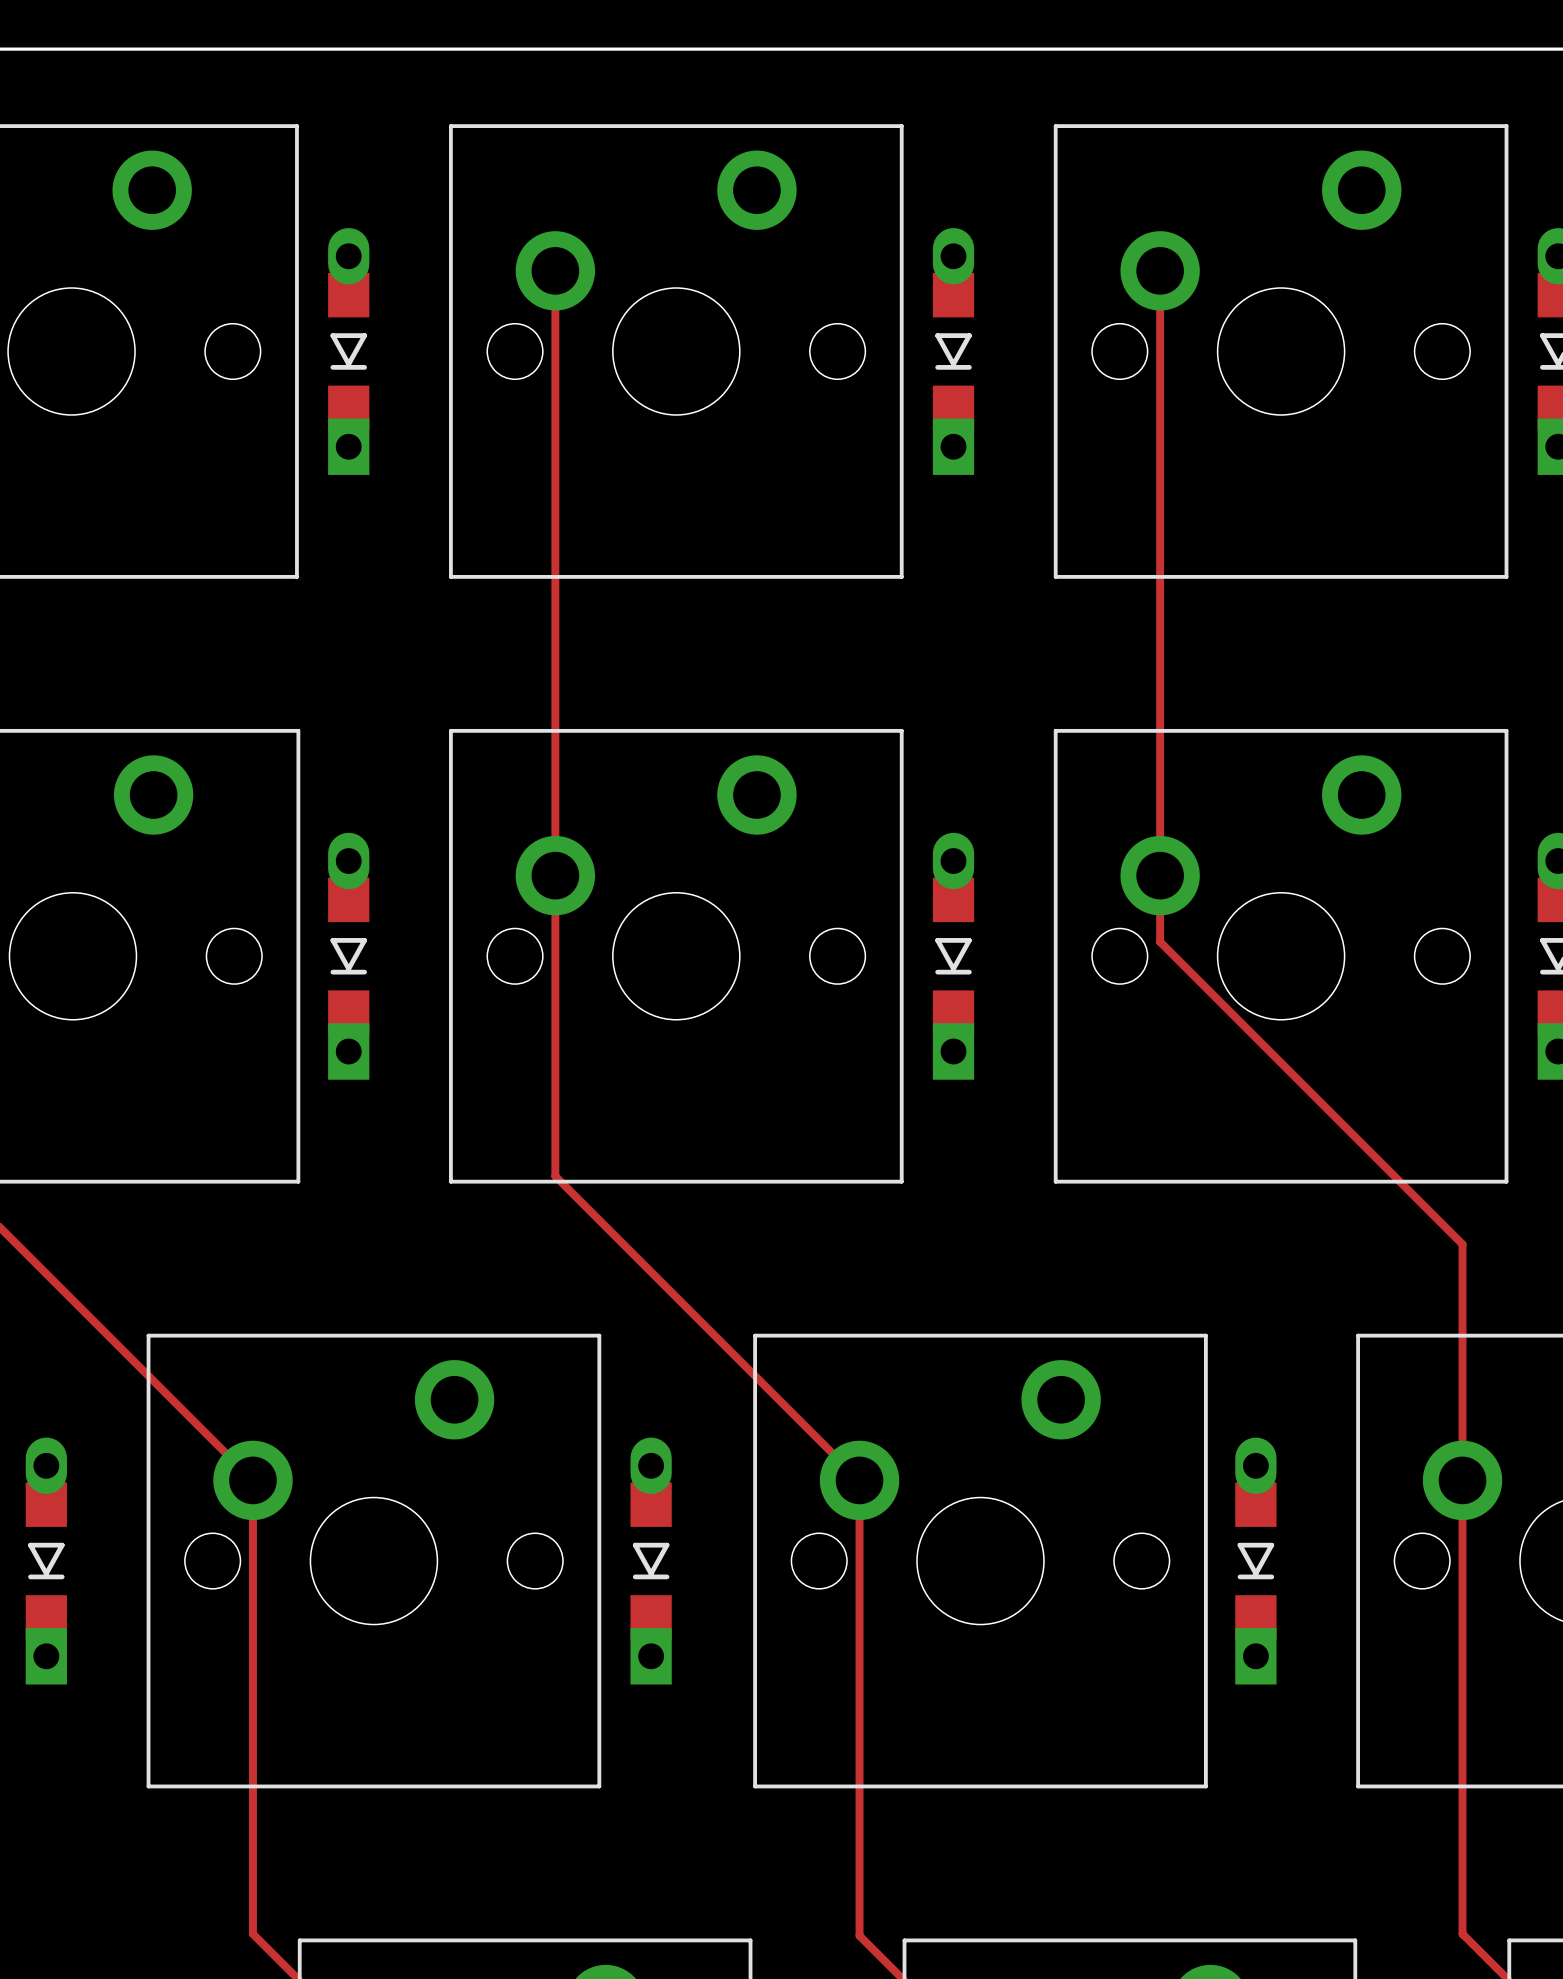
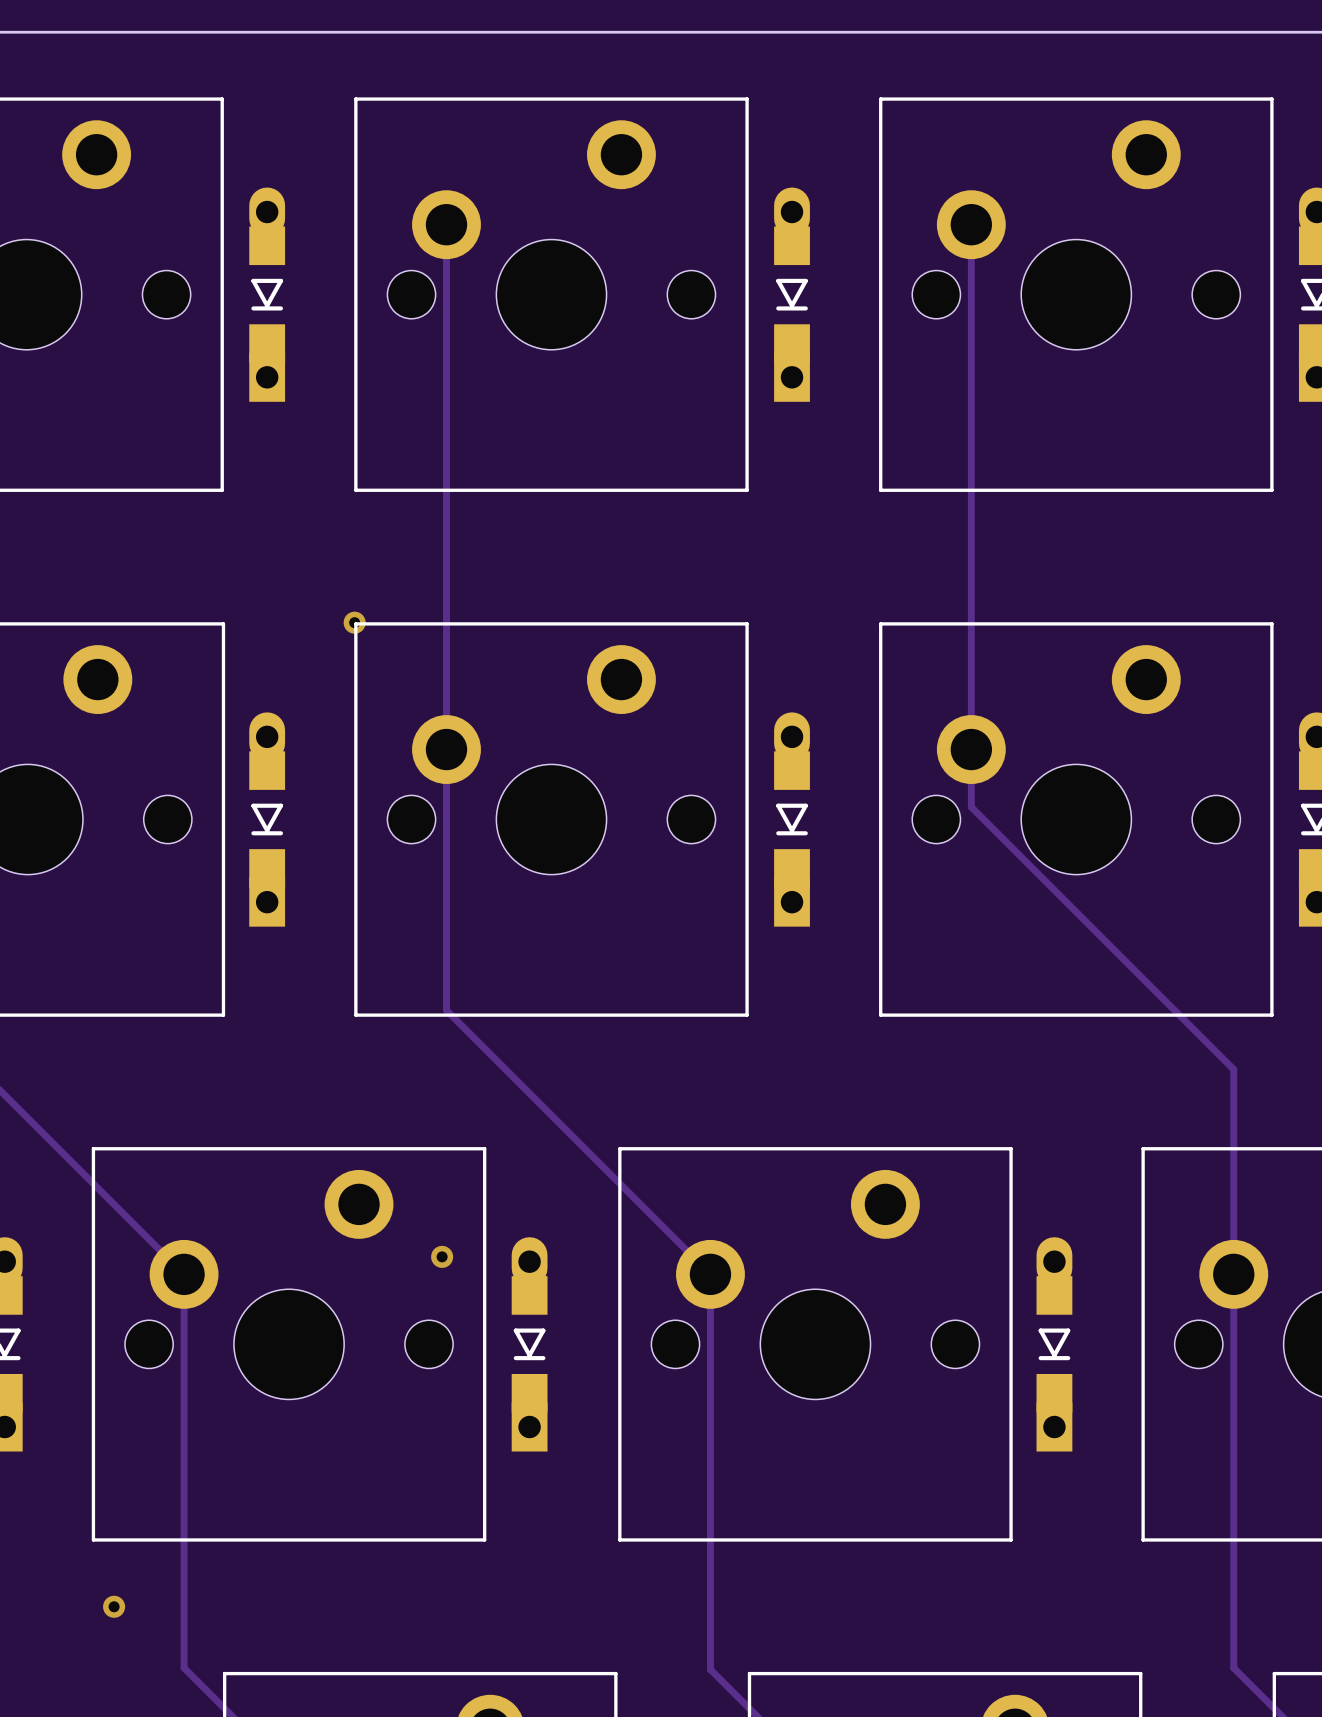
via: none -> (354, 622)
via: none -> (442, 1256)
via: none -> (114, 1606)

